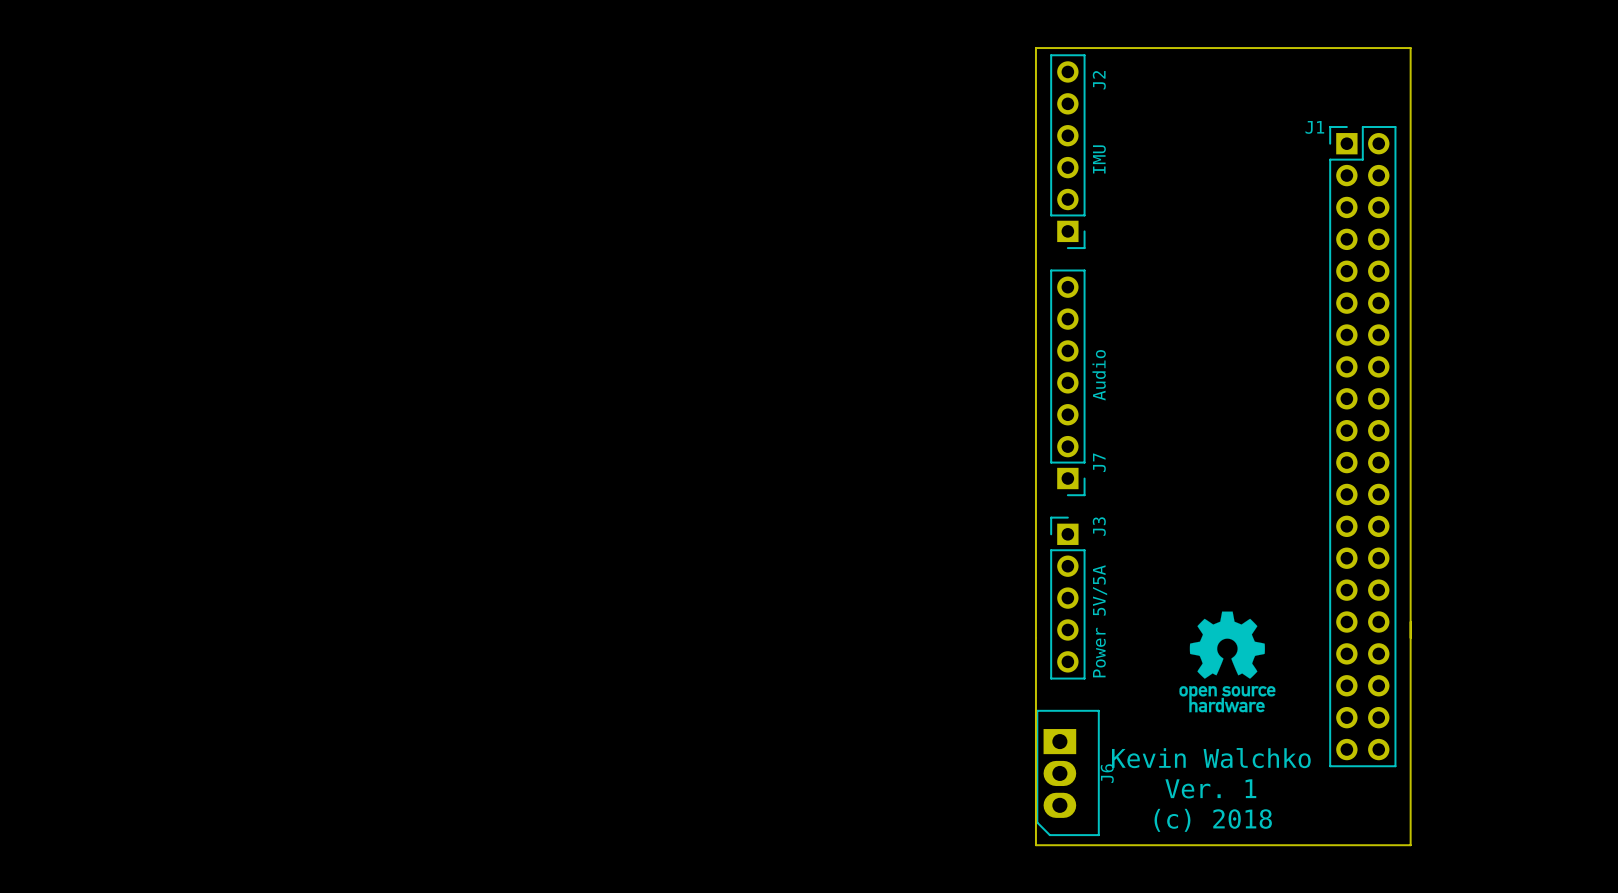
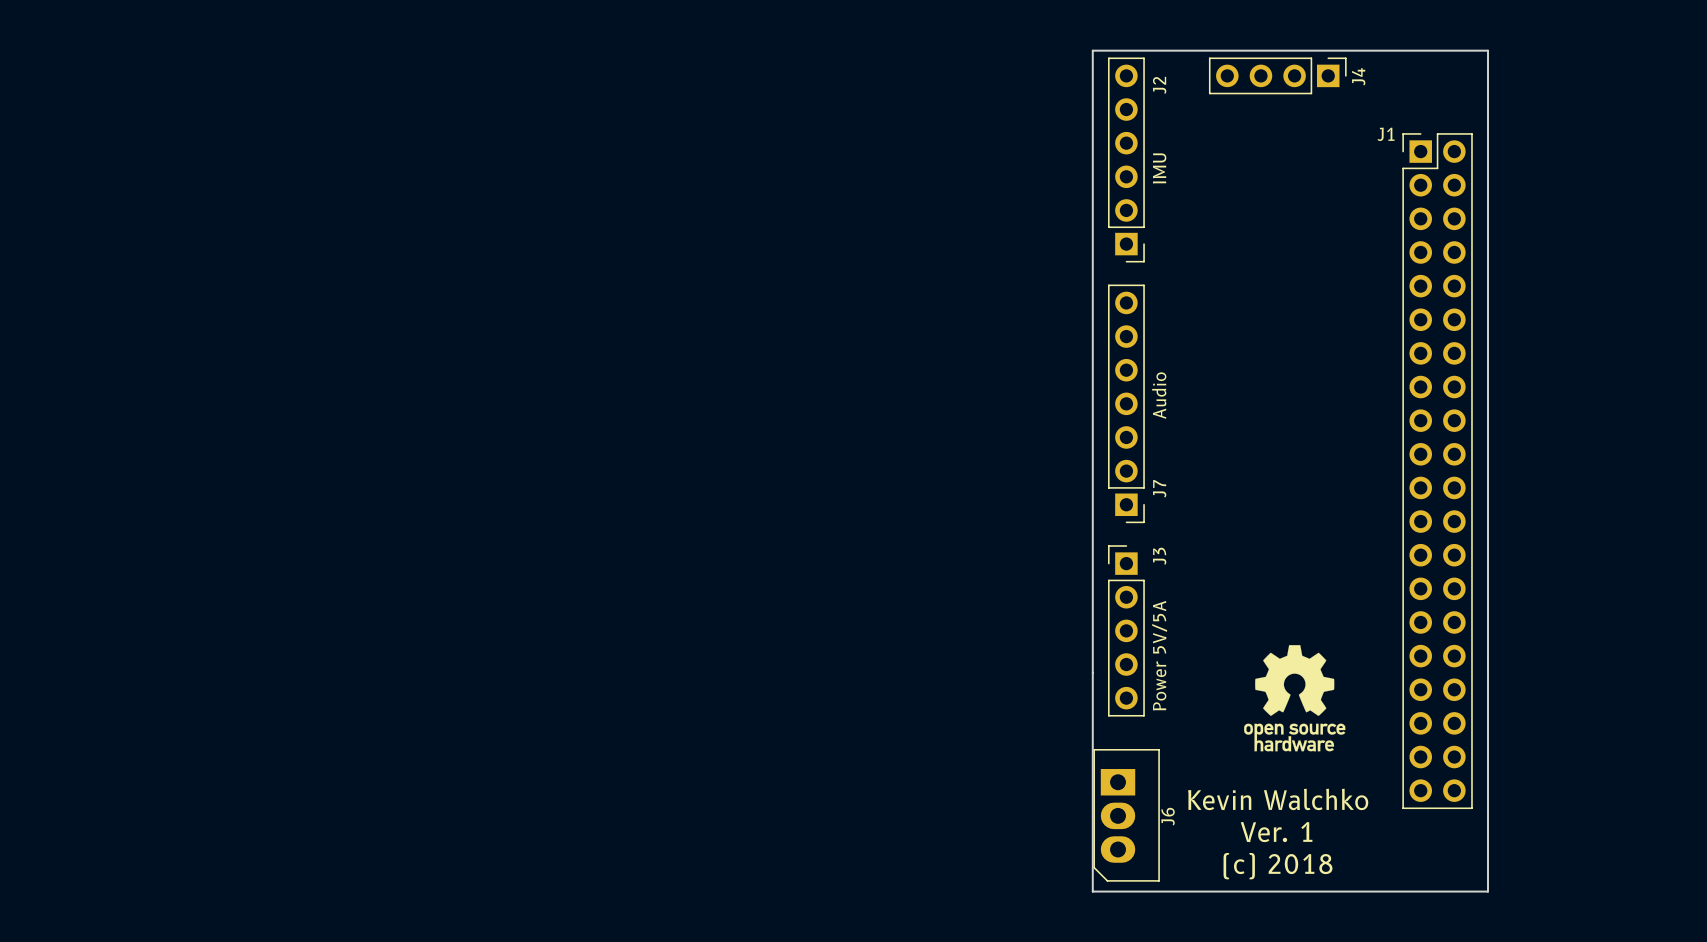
J4: none -> (1277, 75)

